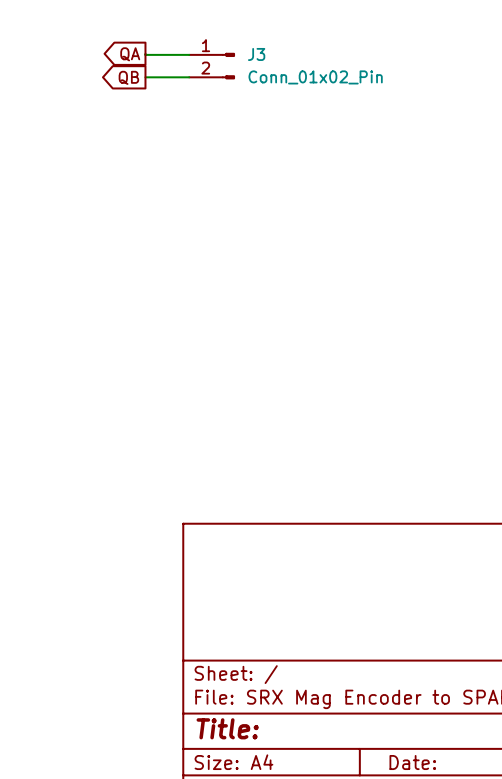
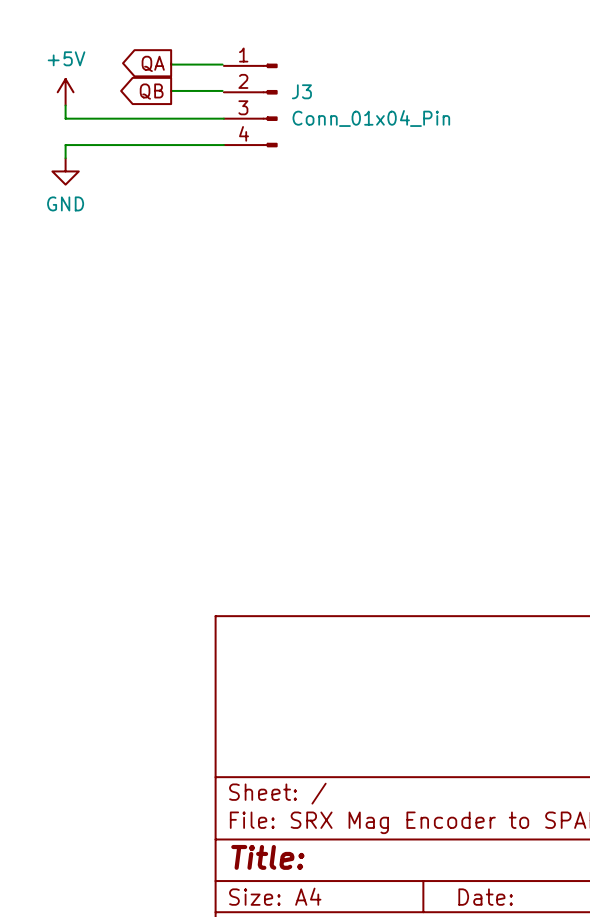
J3 symbol: [189, 53, 235, 80] -> [223, 63, 278, 148]
J3 value: Conn_01x02_Pin (315, 77) -> Conn_01x04_Pin (371, 118)
power symbol: none -> +5V (65, 92)
wire: none -> (65, 105) (65, 118) (223, 118)
wire: none -> (223, 145) (65, 145) (65, 158)
power symbol: none -> GND (65, 171)

